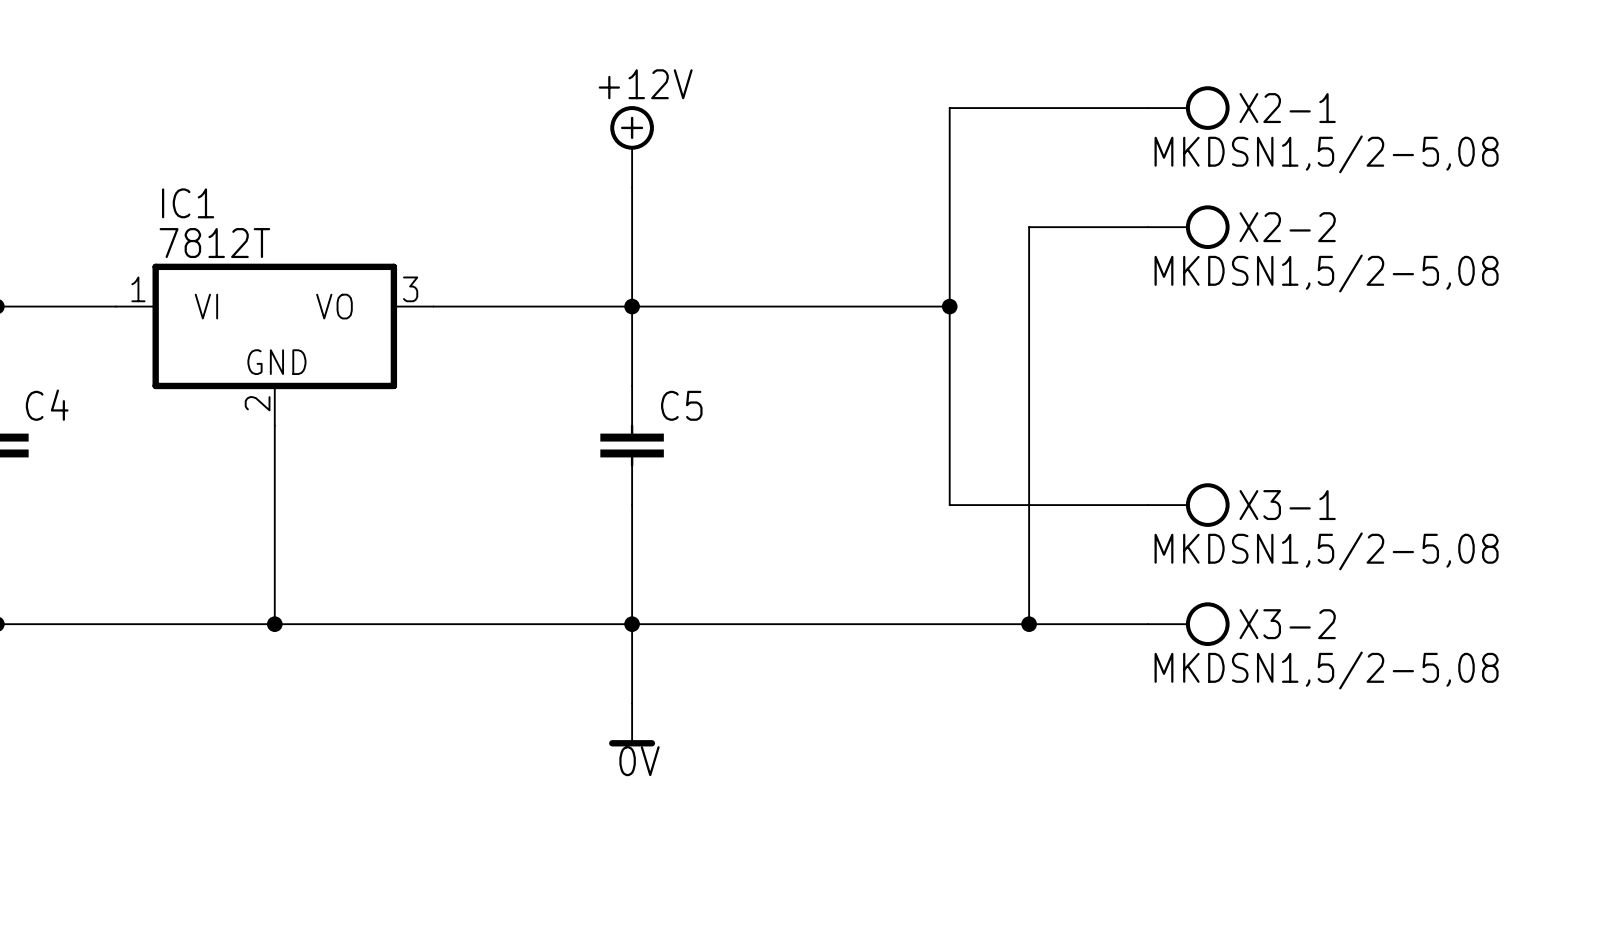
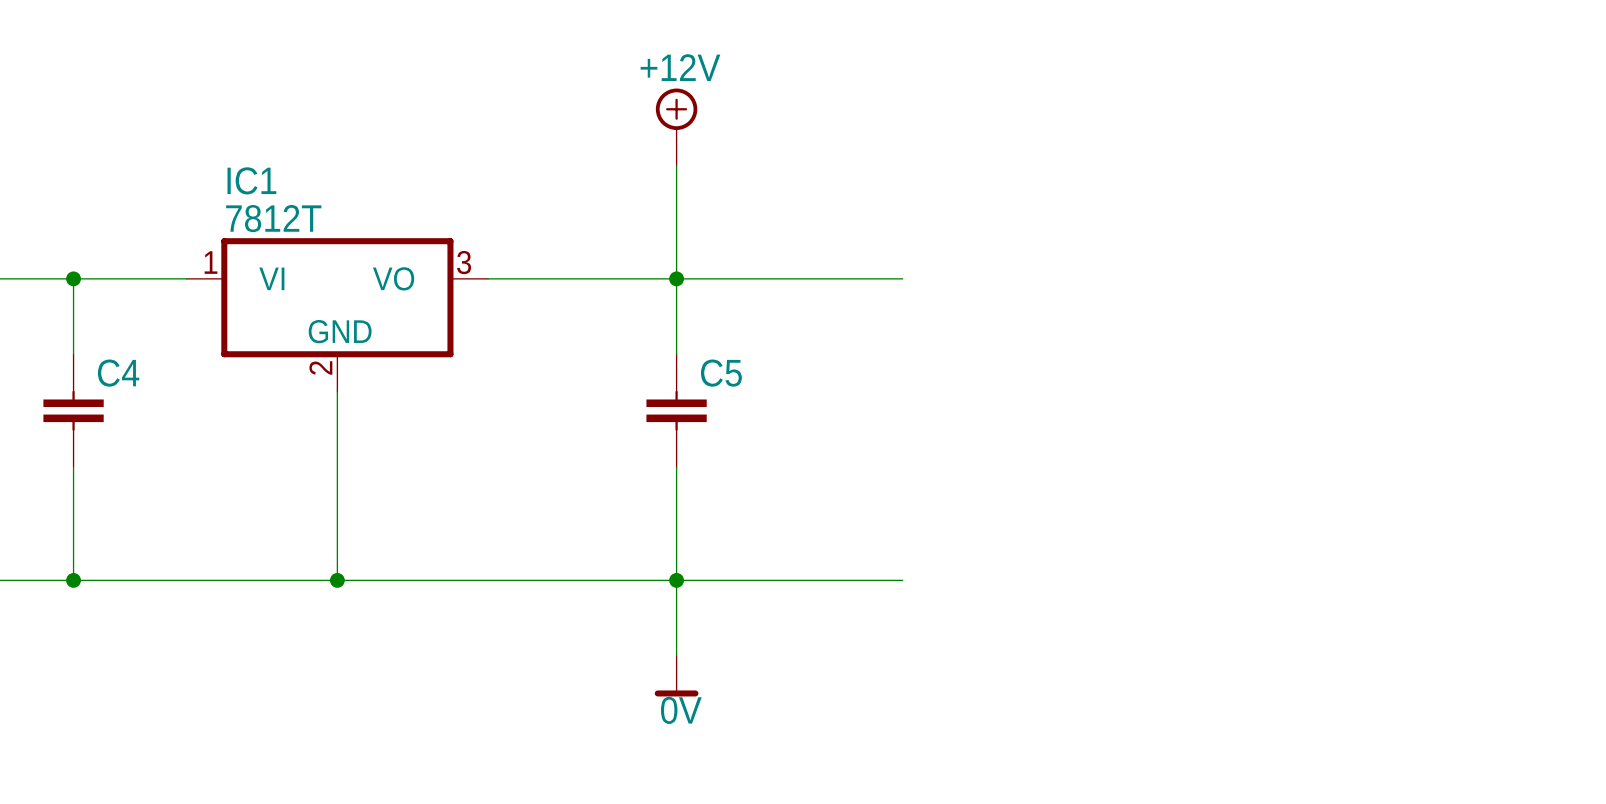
wire: (1148, 108) (949, 108) (949, 505) (1148, 505) -> none
X2-1: MKDSN1,5/2-5,08 (1188, 108) -> none
wire: (1148, 227) (1029, 227) (1029, 624) -> none
X2-2: MKDSN1,5/2-5,08 (1188, 227) -> none
wire: (870, 306) (949, 306) -> none
junction: (949, 306) -> none
X3-1: MKDSN1,5/2-5,08 (1188, 505) -> none
wire: (870, 624) (1148, 624) -> none
junction: (1029, 624) -> none
X3-2: MKDSN1,5/2-5,08 (1188, 624) -> none

